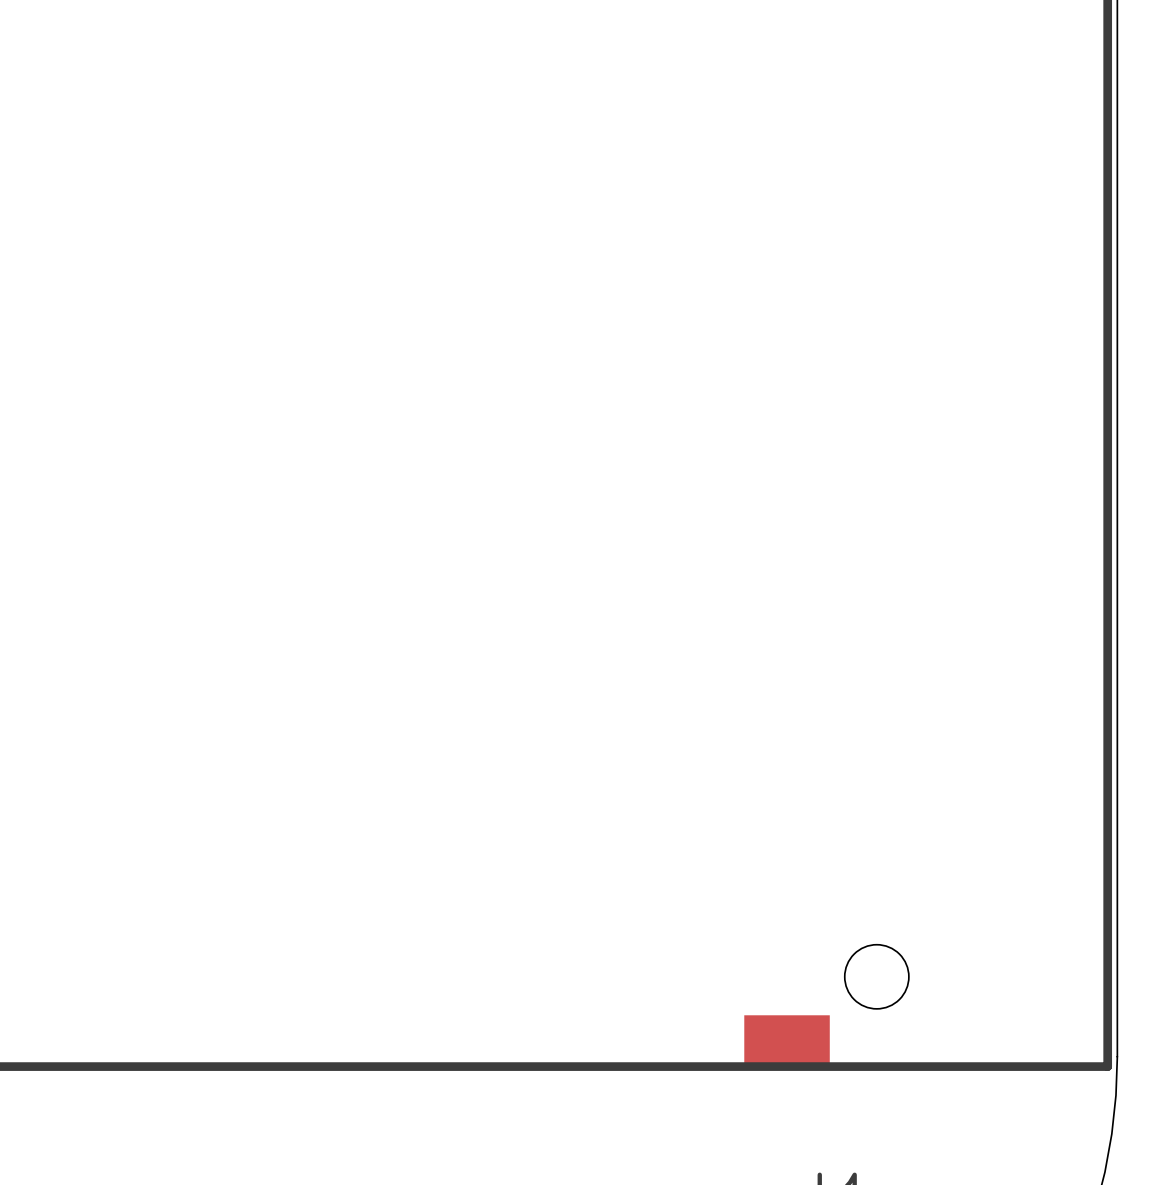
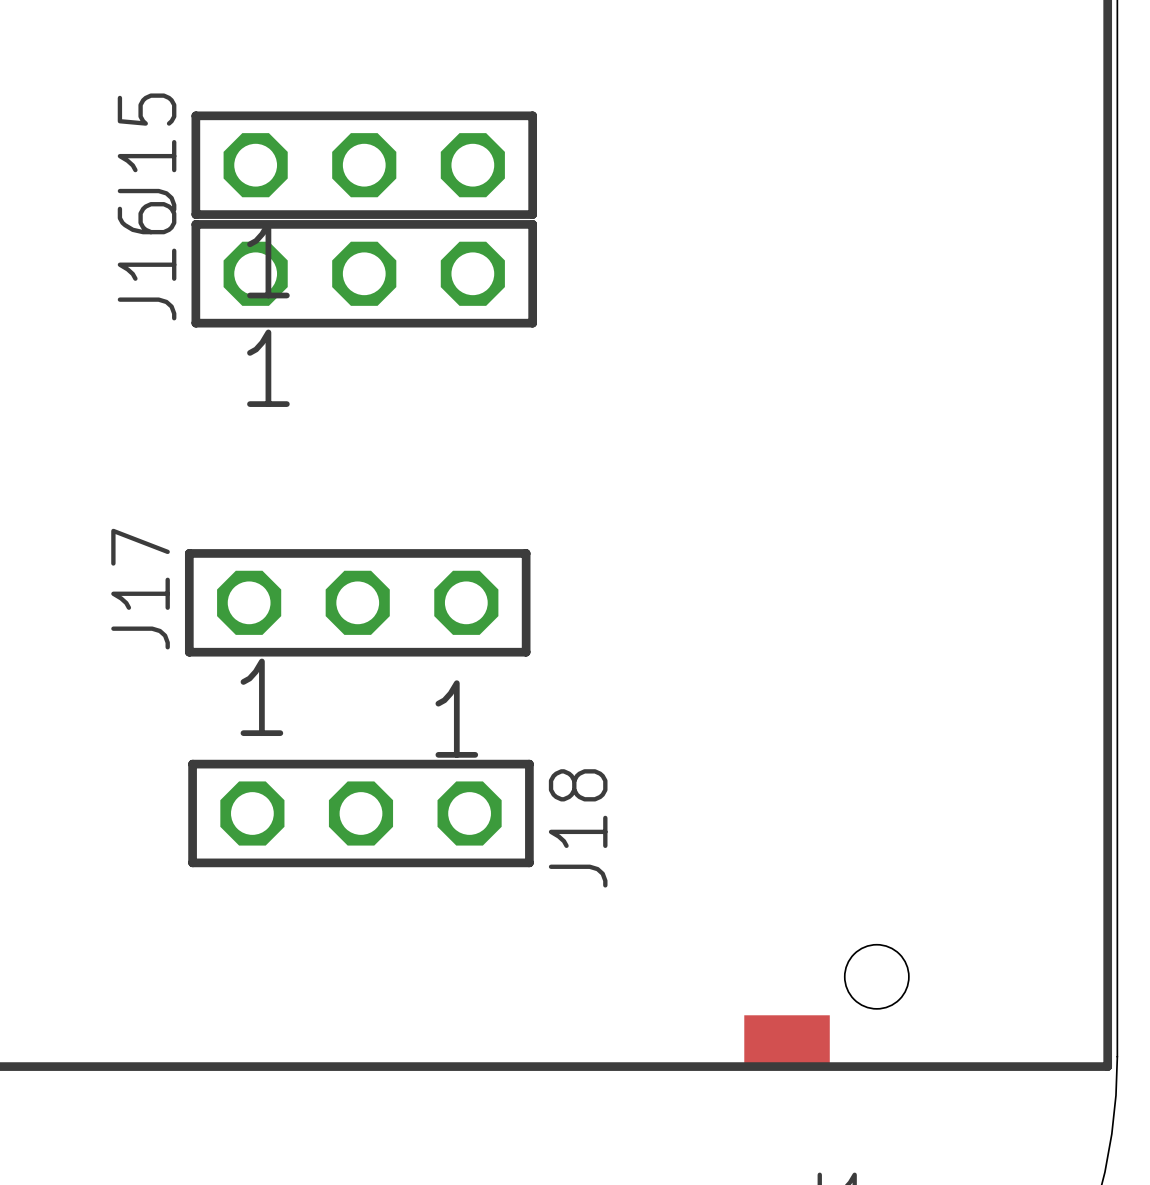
J15: none -> (364, 165)
J16: none -> (364, 273)
J17: none -> (357, 602)
J18: none -> (360, 813)

